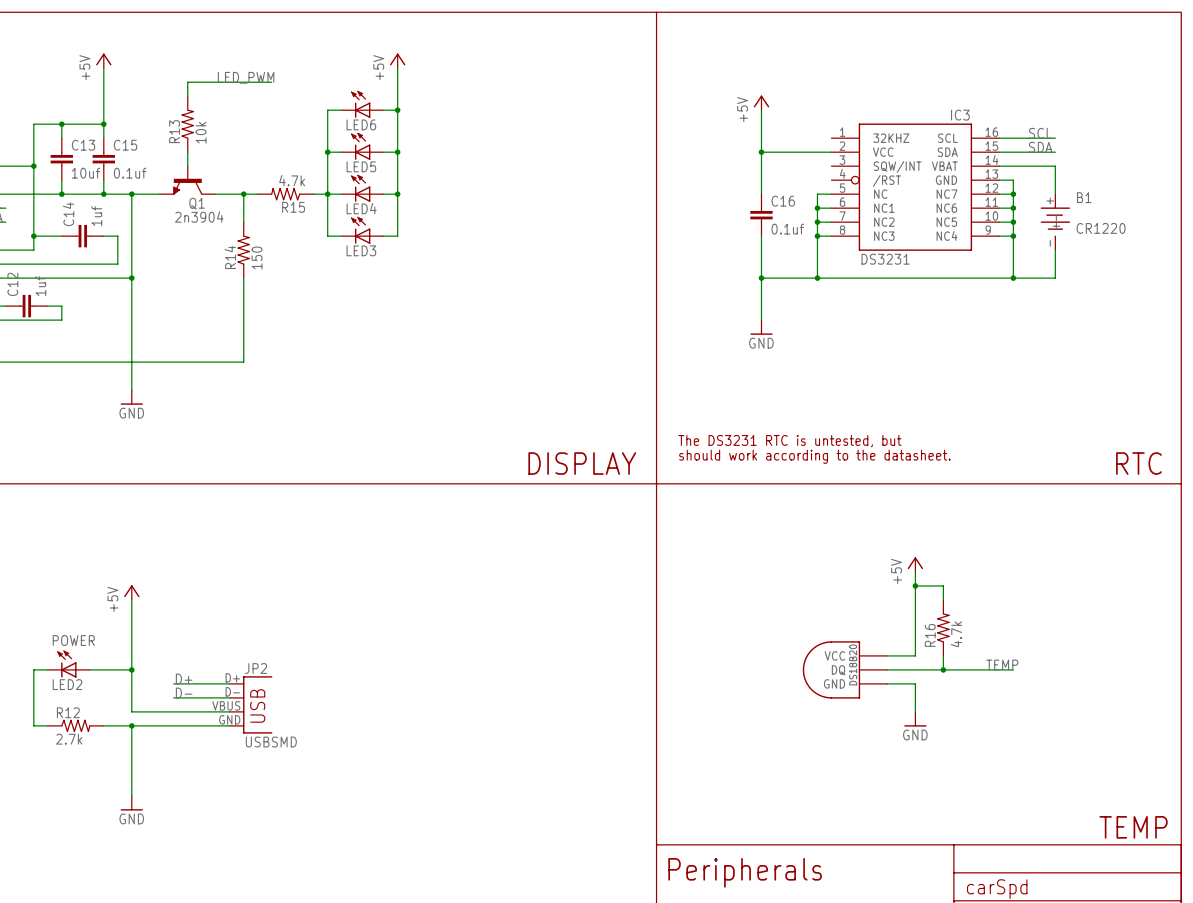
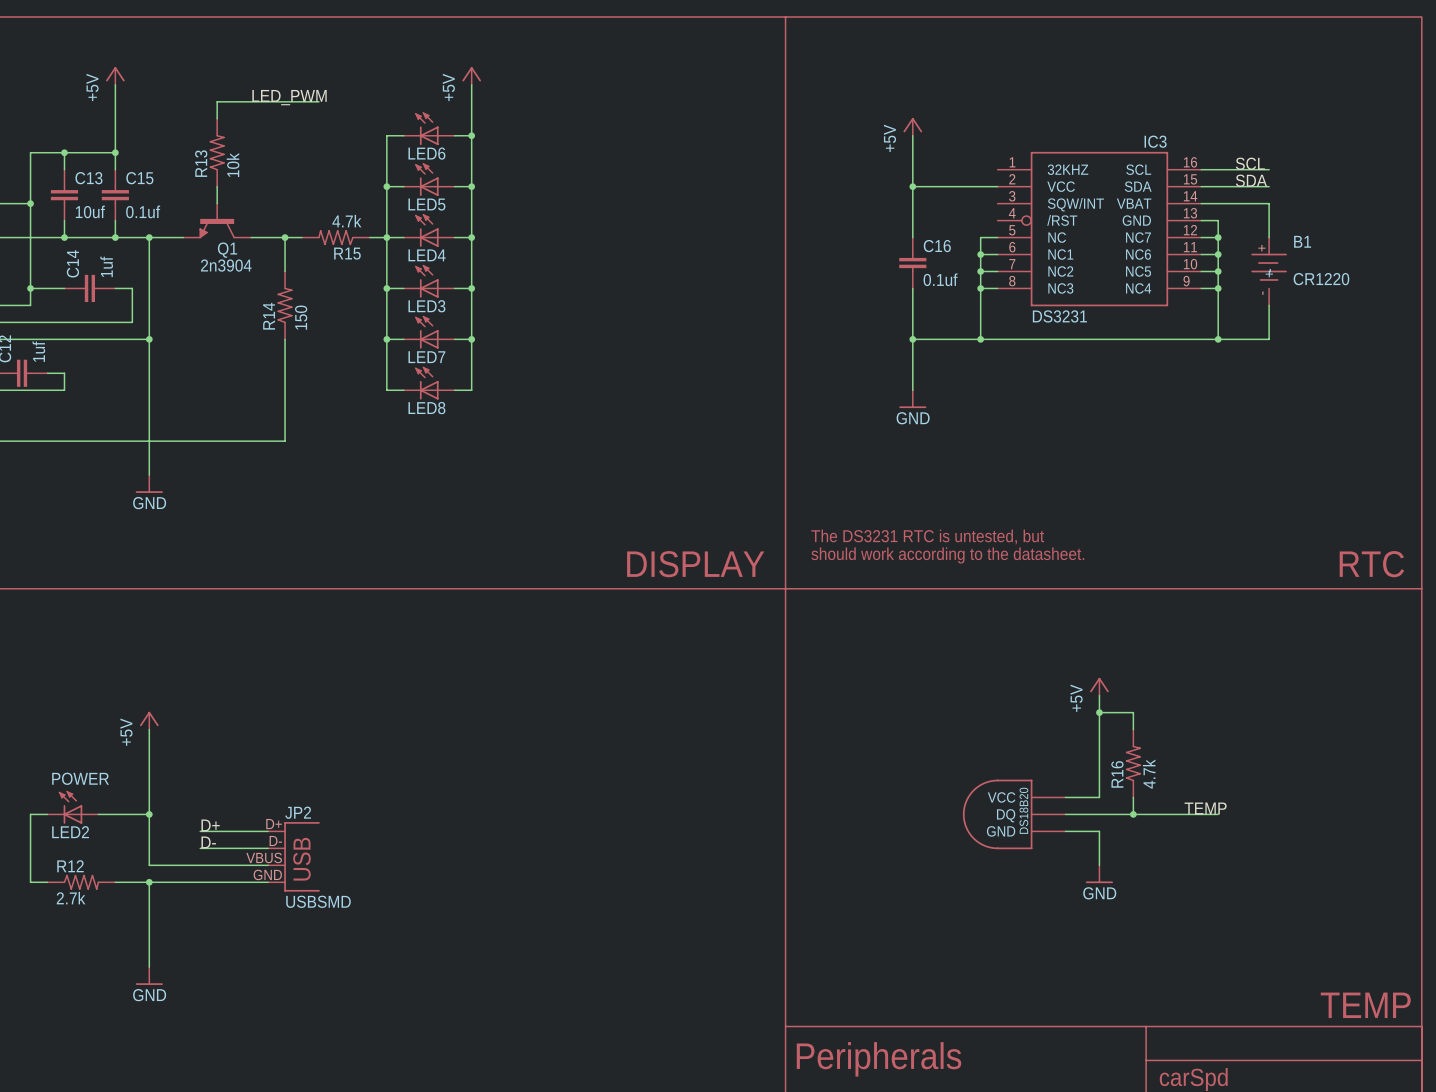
wire: none -> (386, 288) (386, 390) (403, 390)
junction: none -> (386, 288)
wire: none -> (471, 288) (471, 390) (454, 390)
junction: none -> (471, 288)
LED7: none -> (429, 332)
wire: none -> (386, 339) (403, 339)
junction: none -> (386, 339)
wire: none -> (454, 339) (471, 339)
junction: none -> (471, 339)
LED8: none -> (429, 383)

